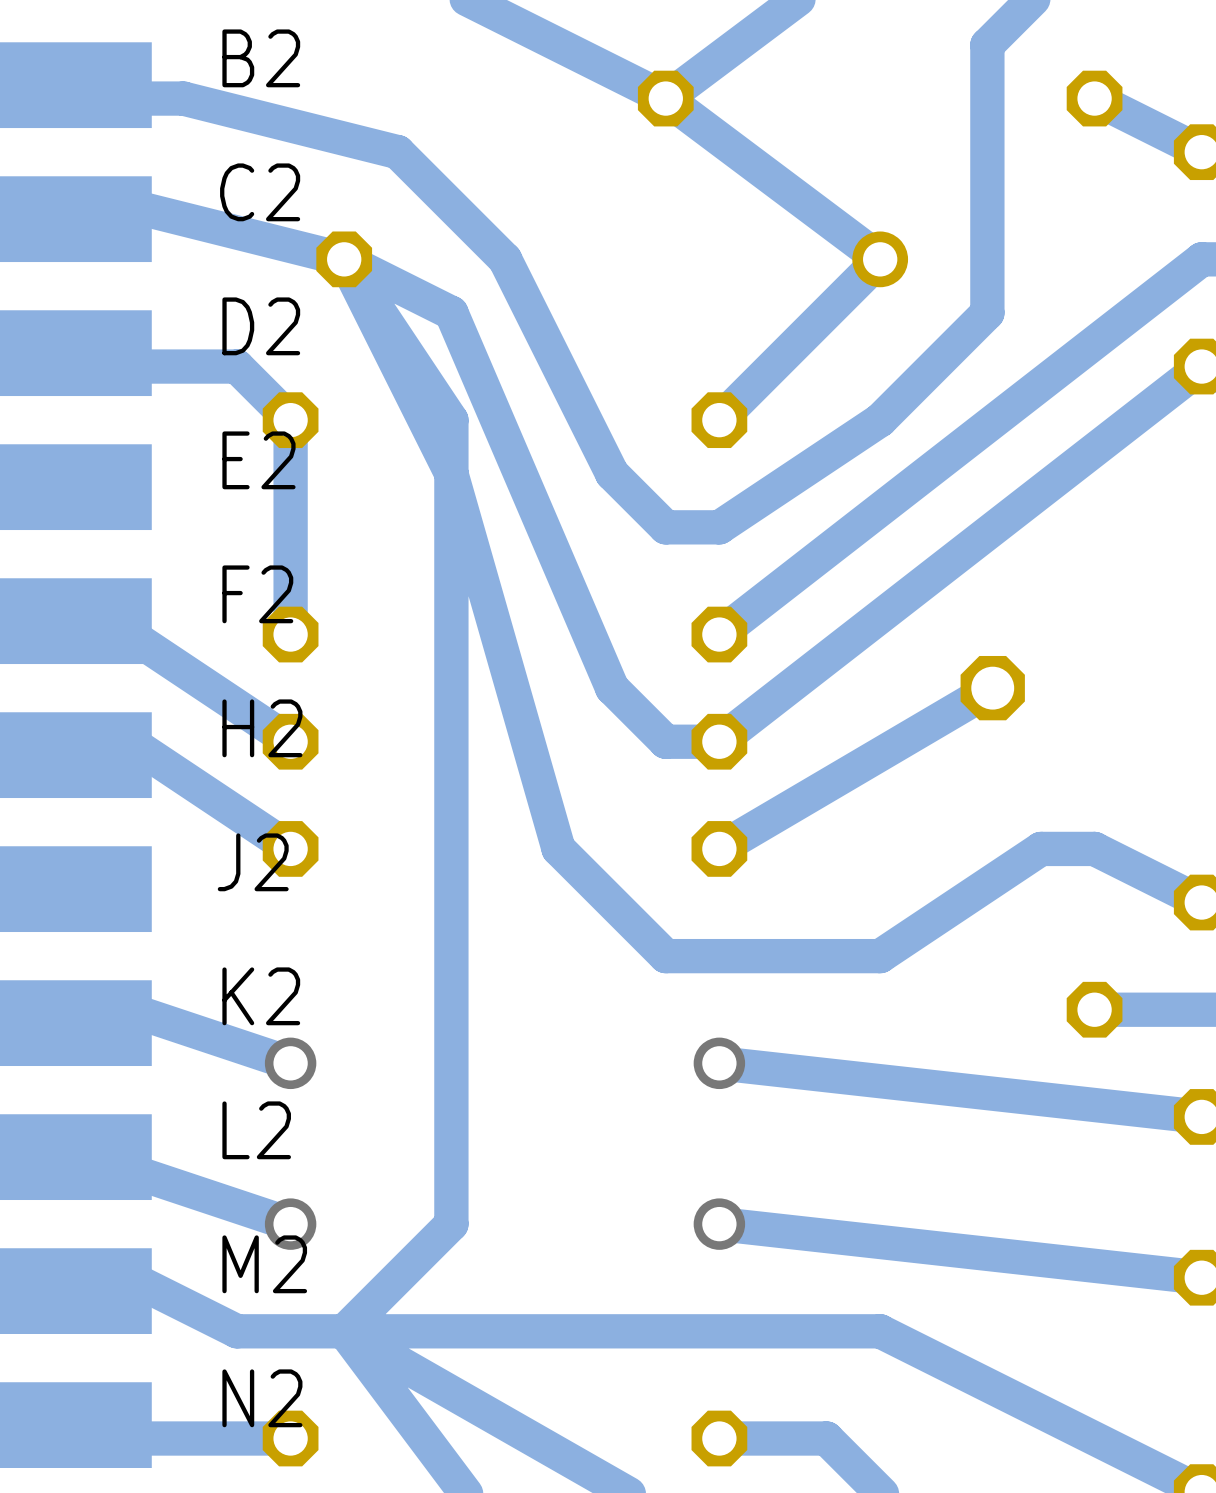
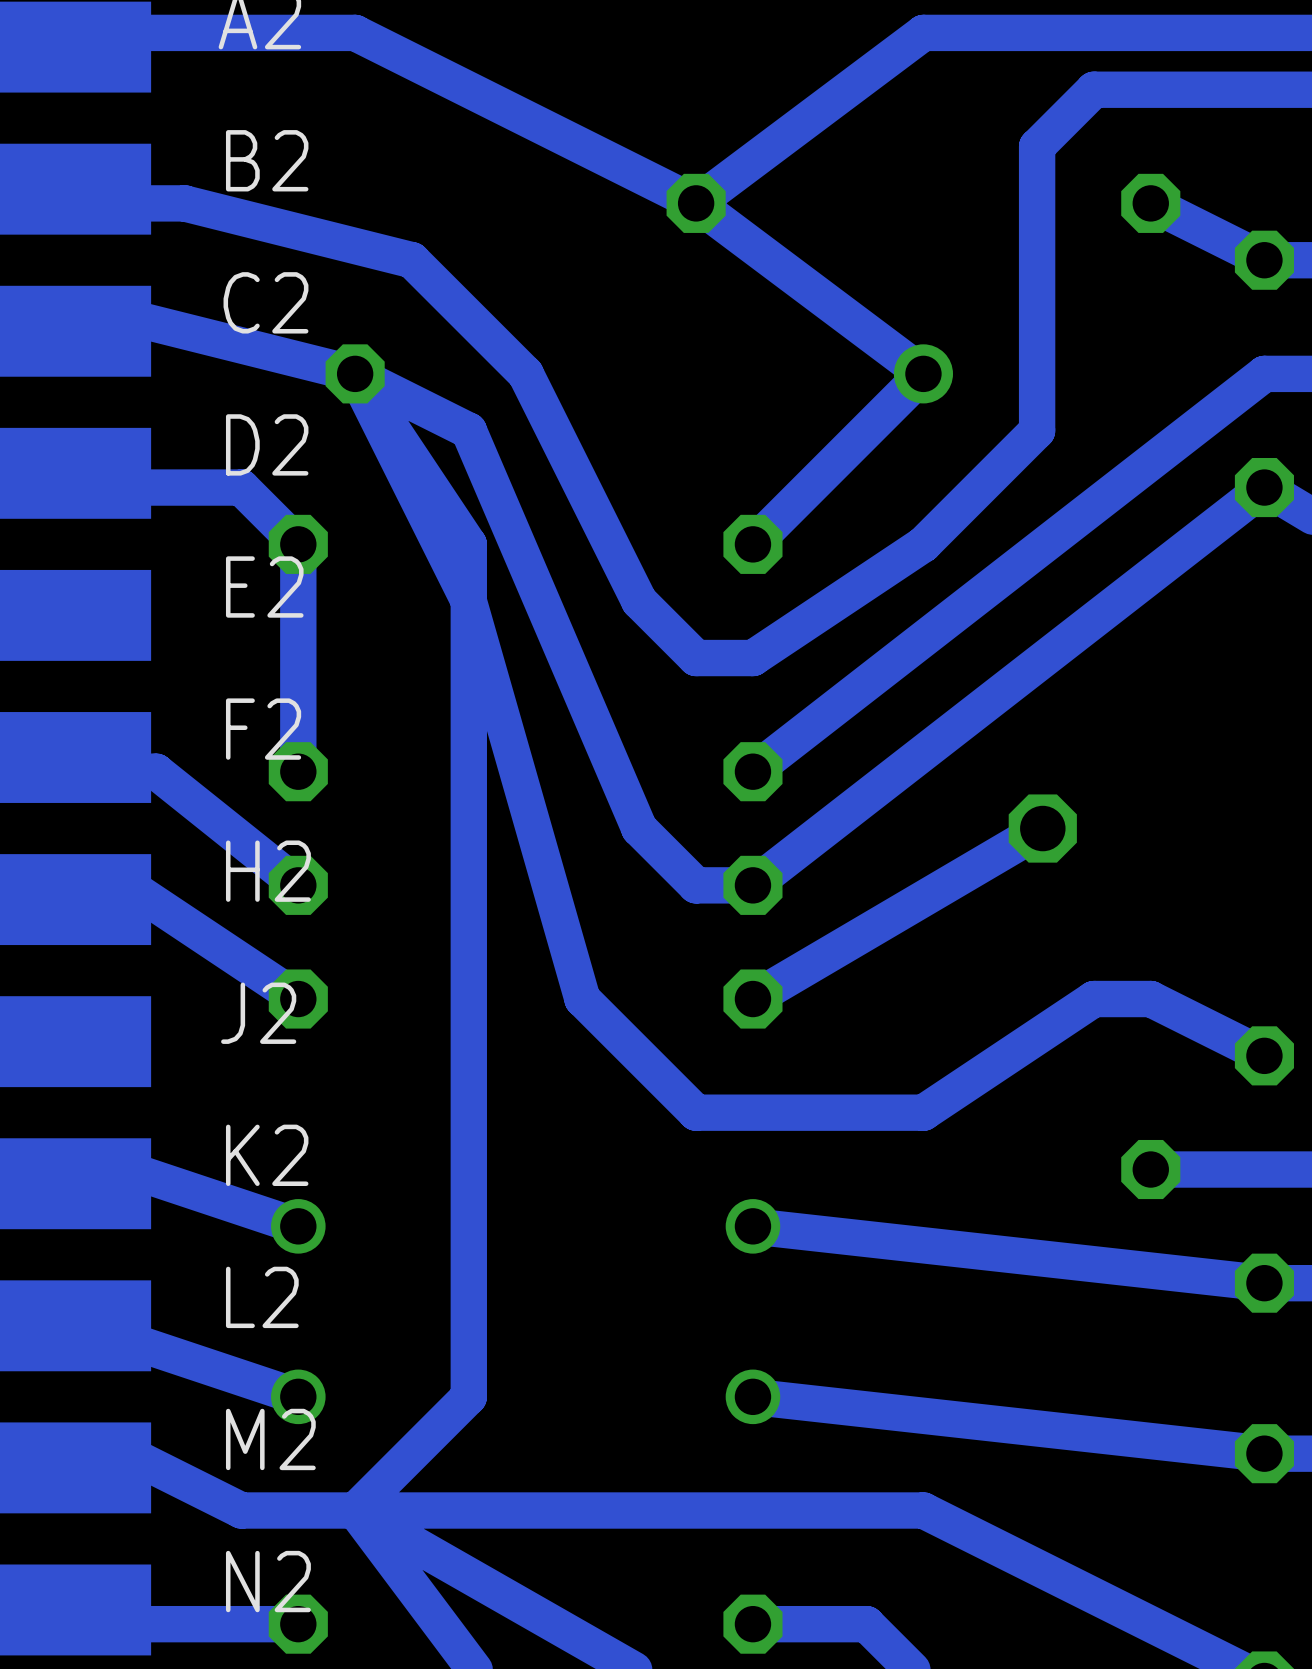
track: (129, 634) (290, 741) -> (127, 771) (156, 771) (298, 885)

